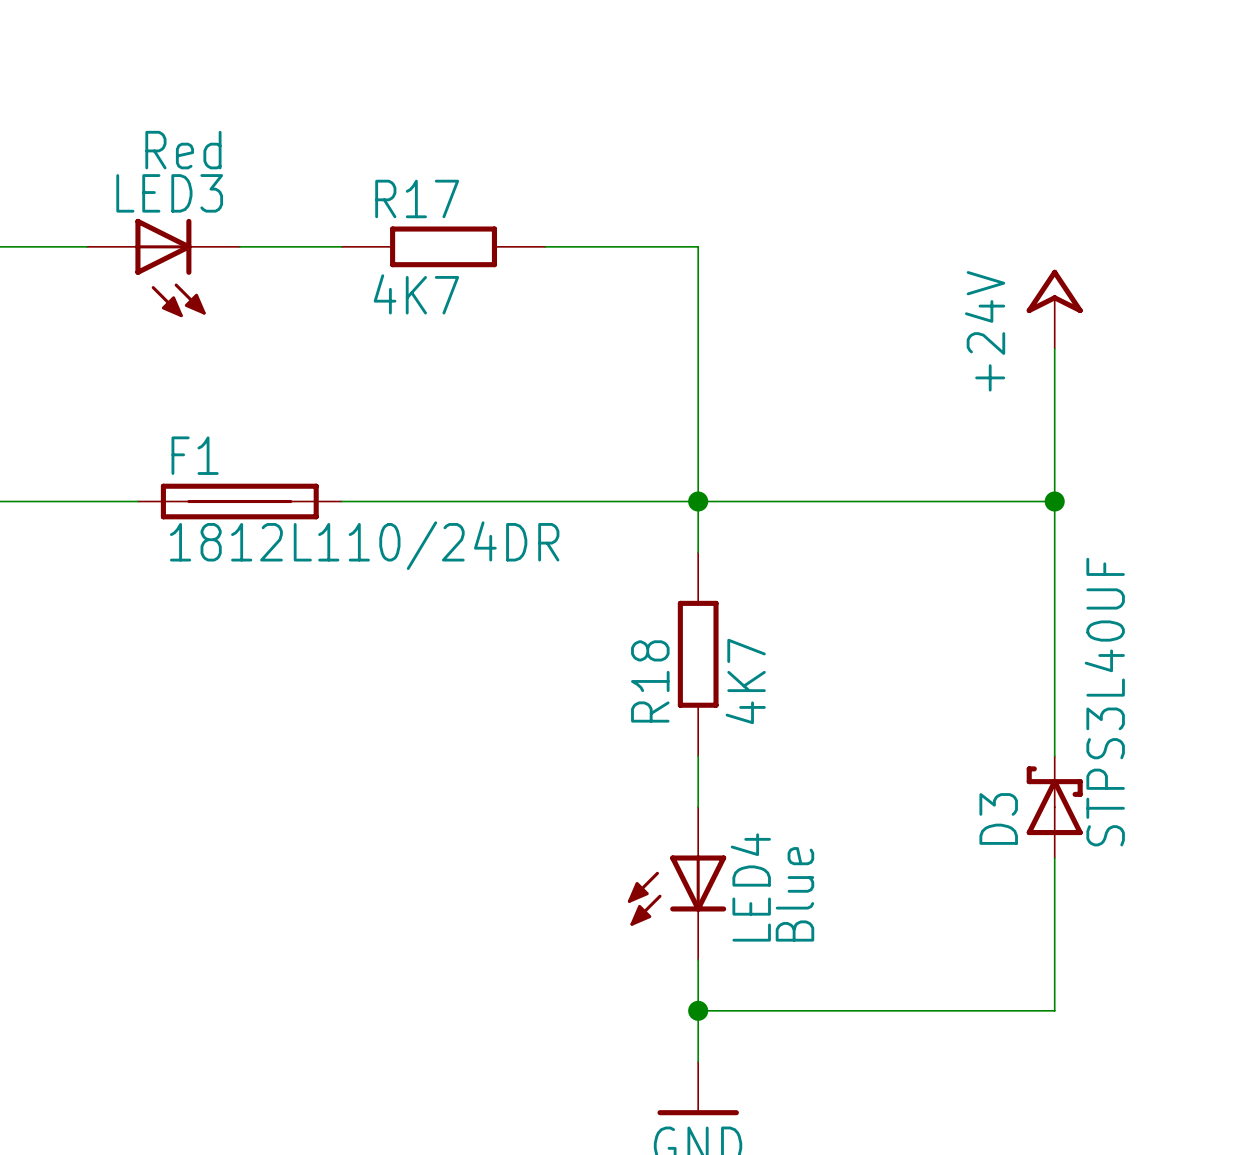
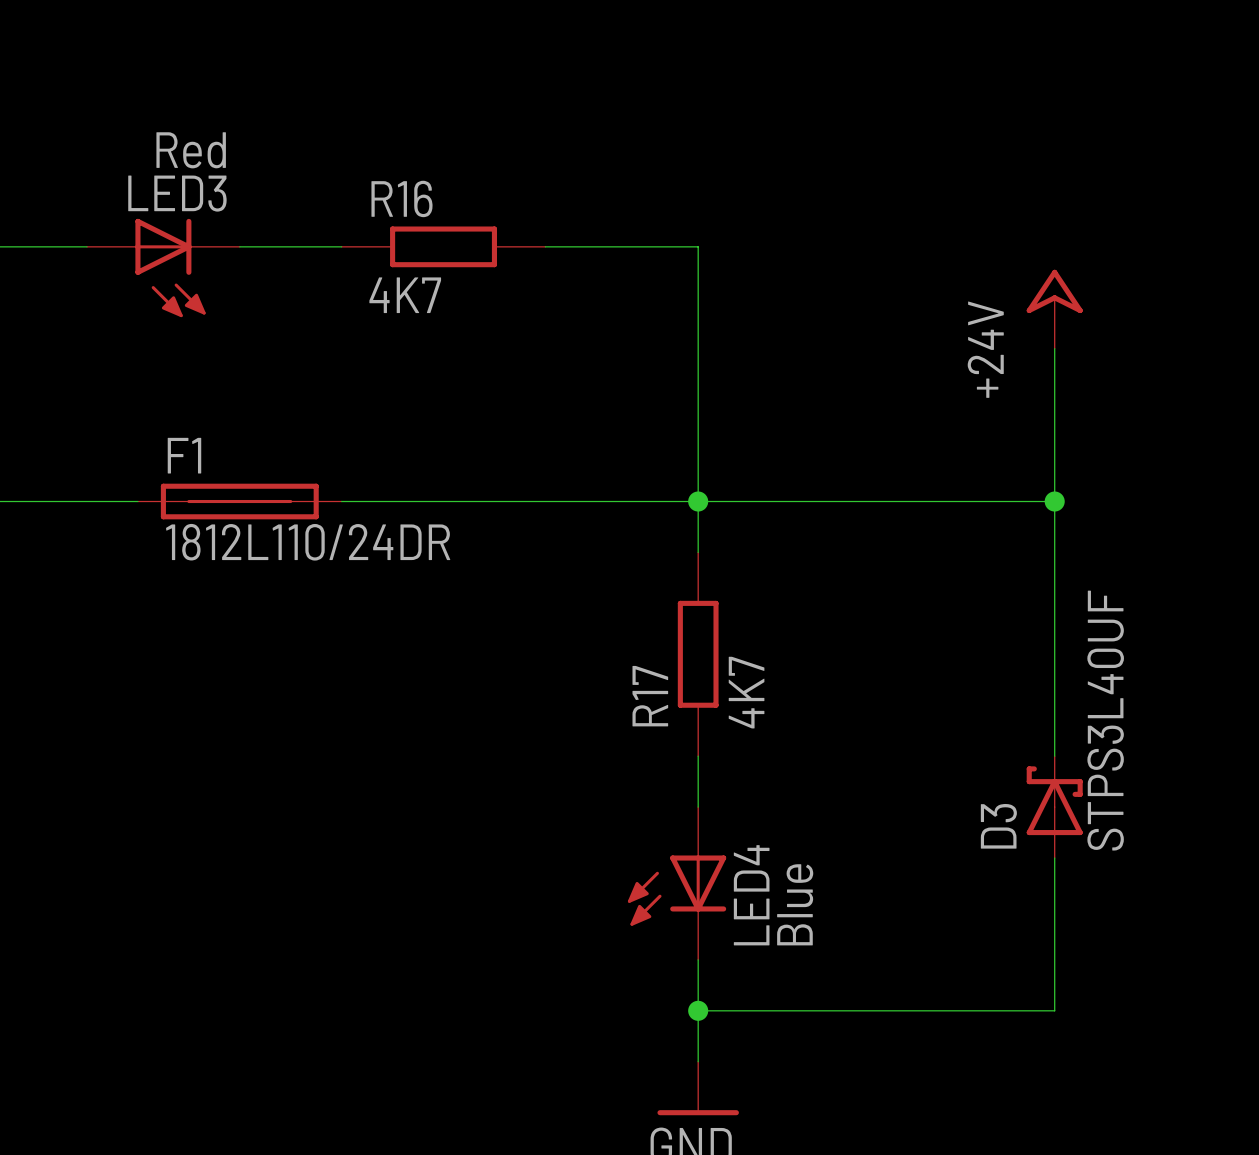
R17 name: R17 (417, 198) -> R16 (401, 198)
R18 name: R18 (650, 681) -> R17 (650, 696)

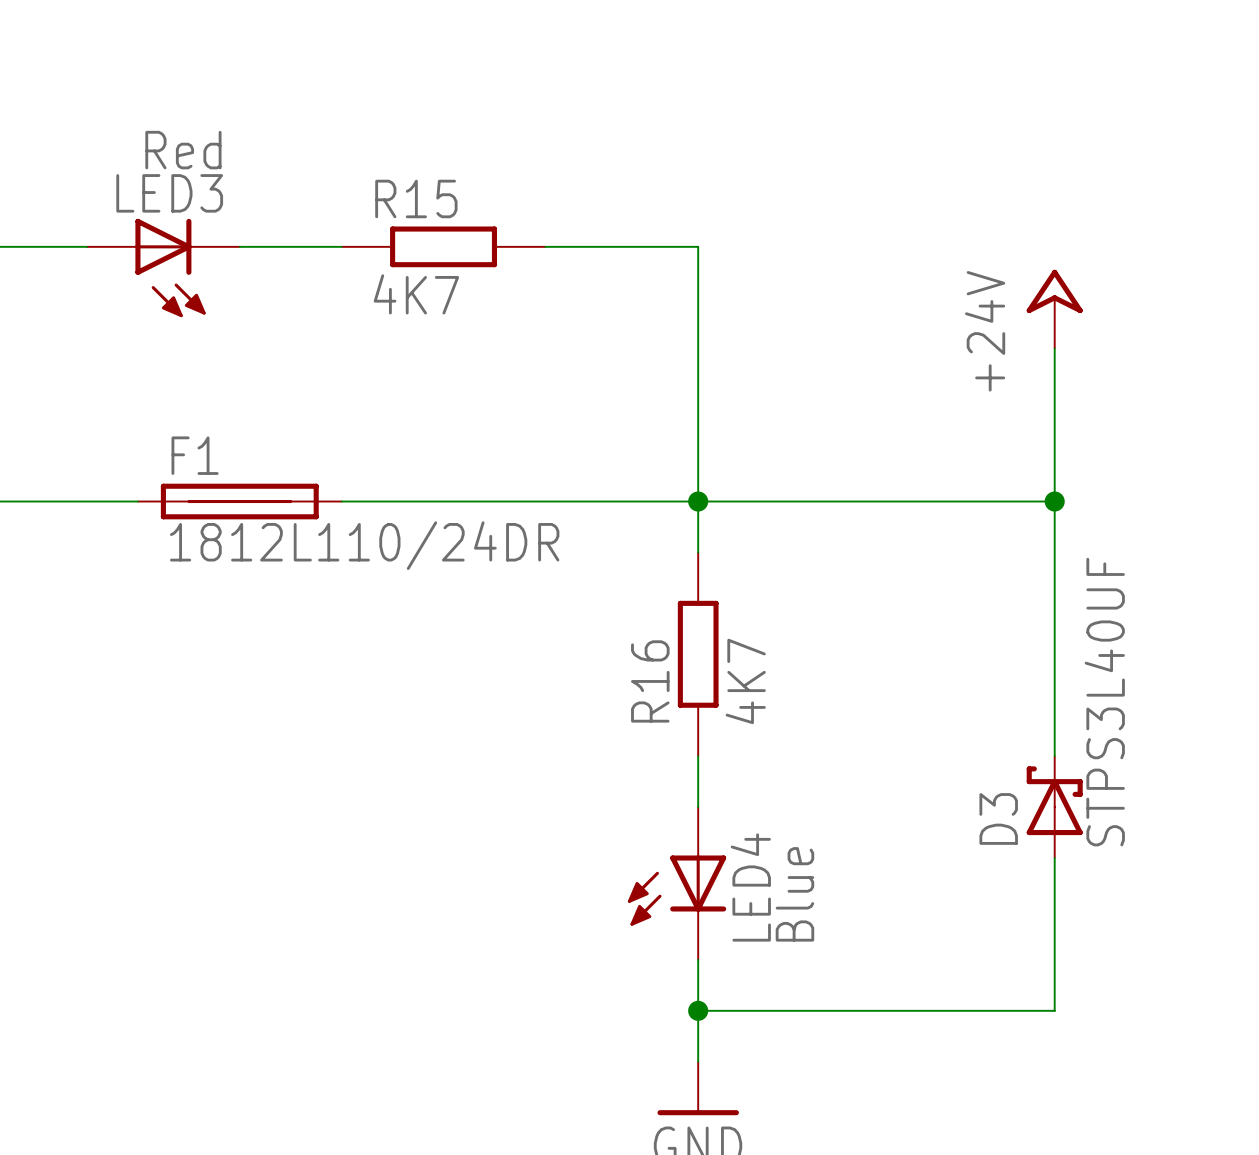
R16 name: R16 (401, 198) -> R15 (416, 198)
R17 name: R17 (650, 696) -> R16 (650, 681)

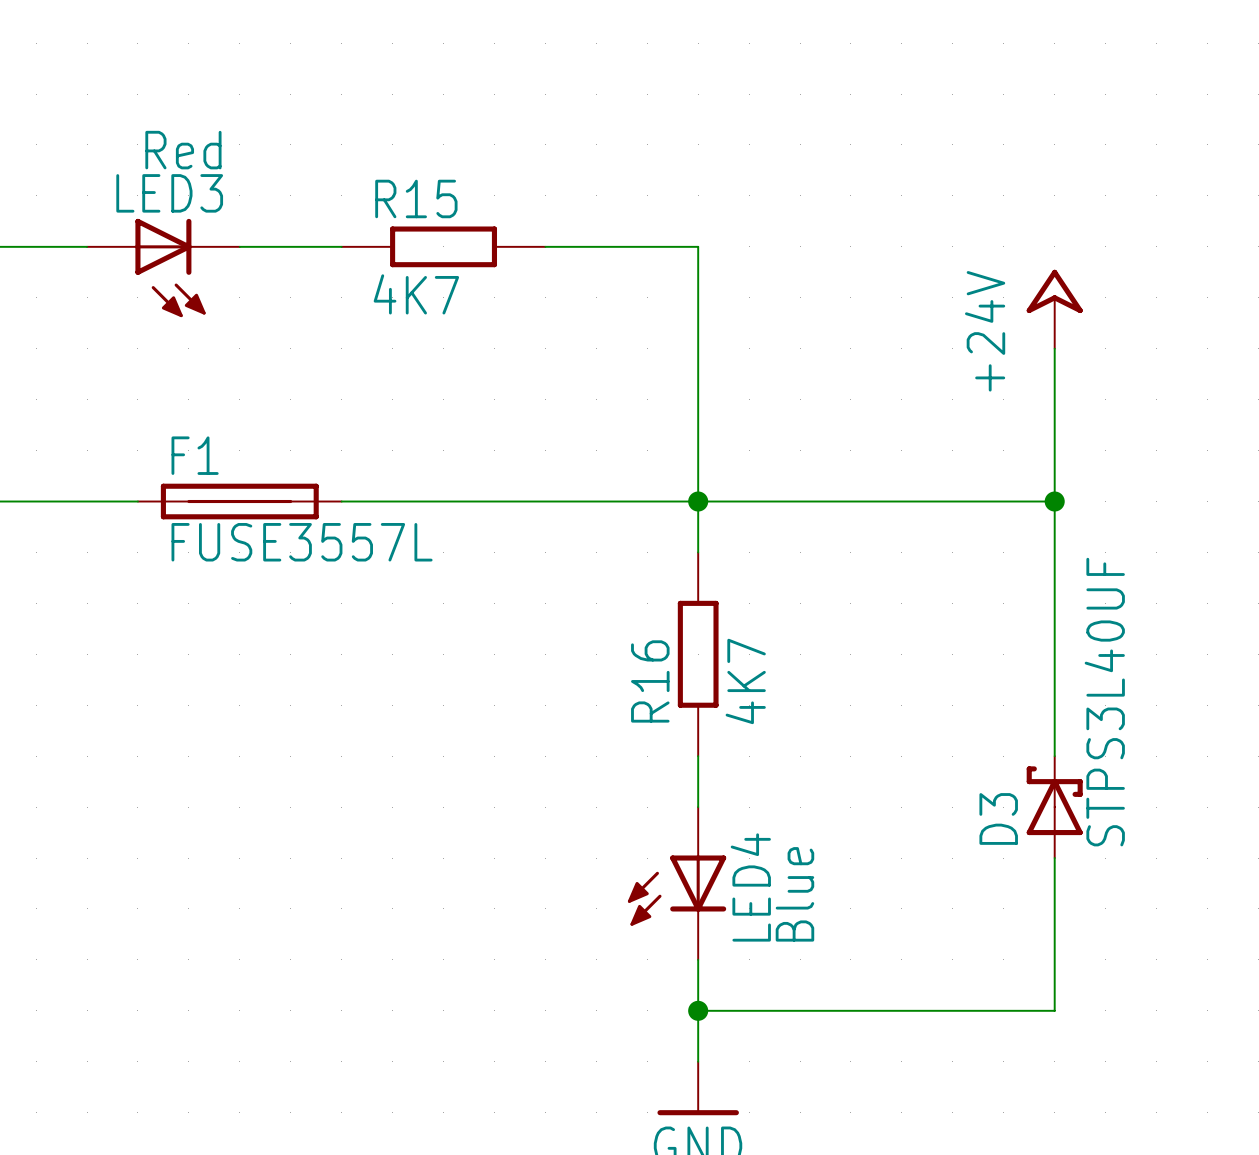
F1 value: 1812L110/24DR (364, 545) -> FUSE3557L (302, 542)

